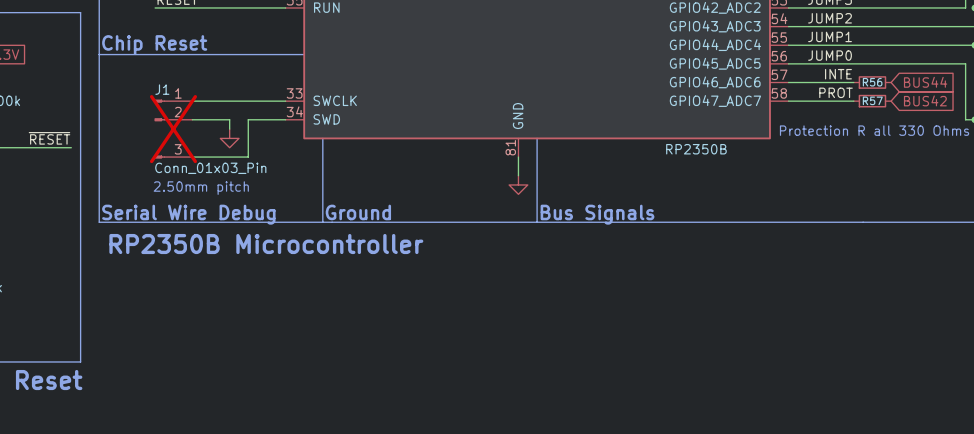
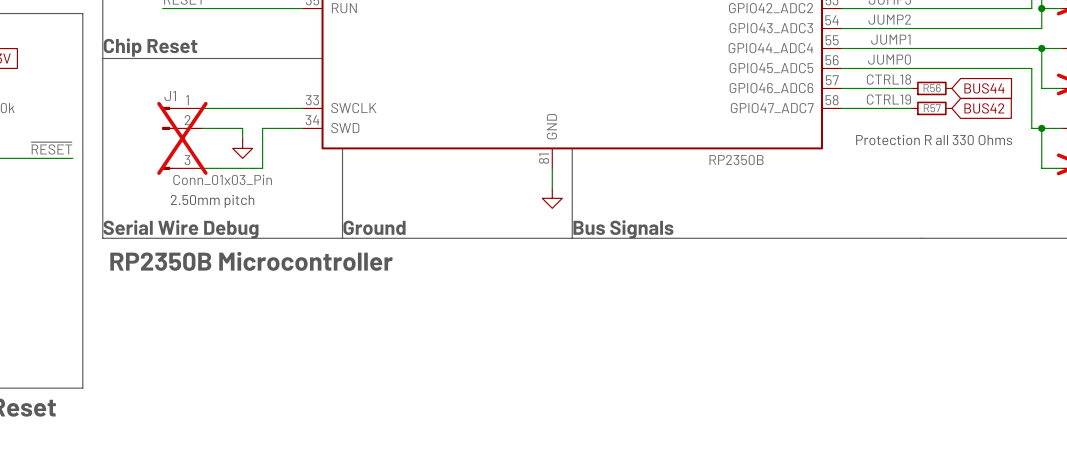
label: INTE (838, 74) -> CTRL18 (888, 79)
label: PROT (836, 92) -> CTRL19 (888, 99)

